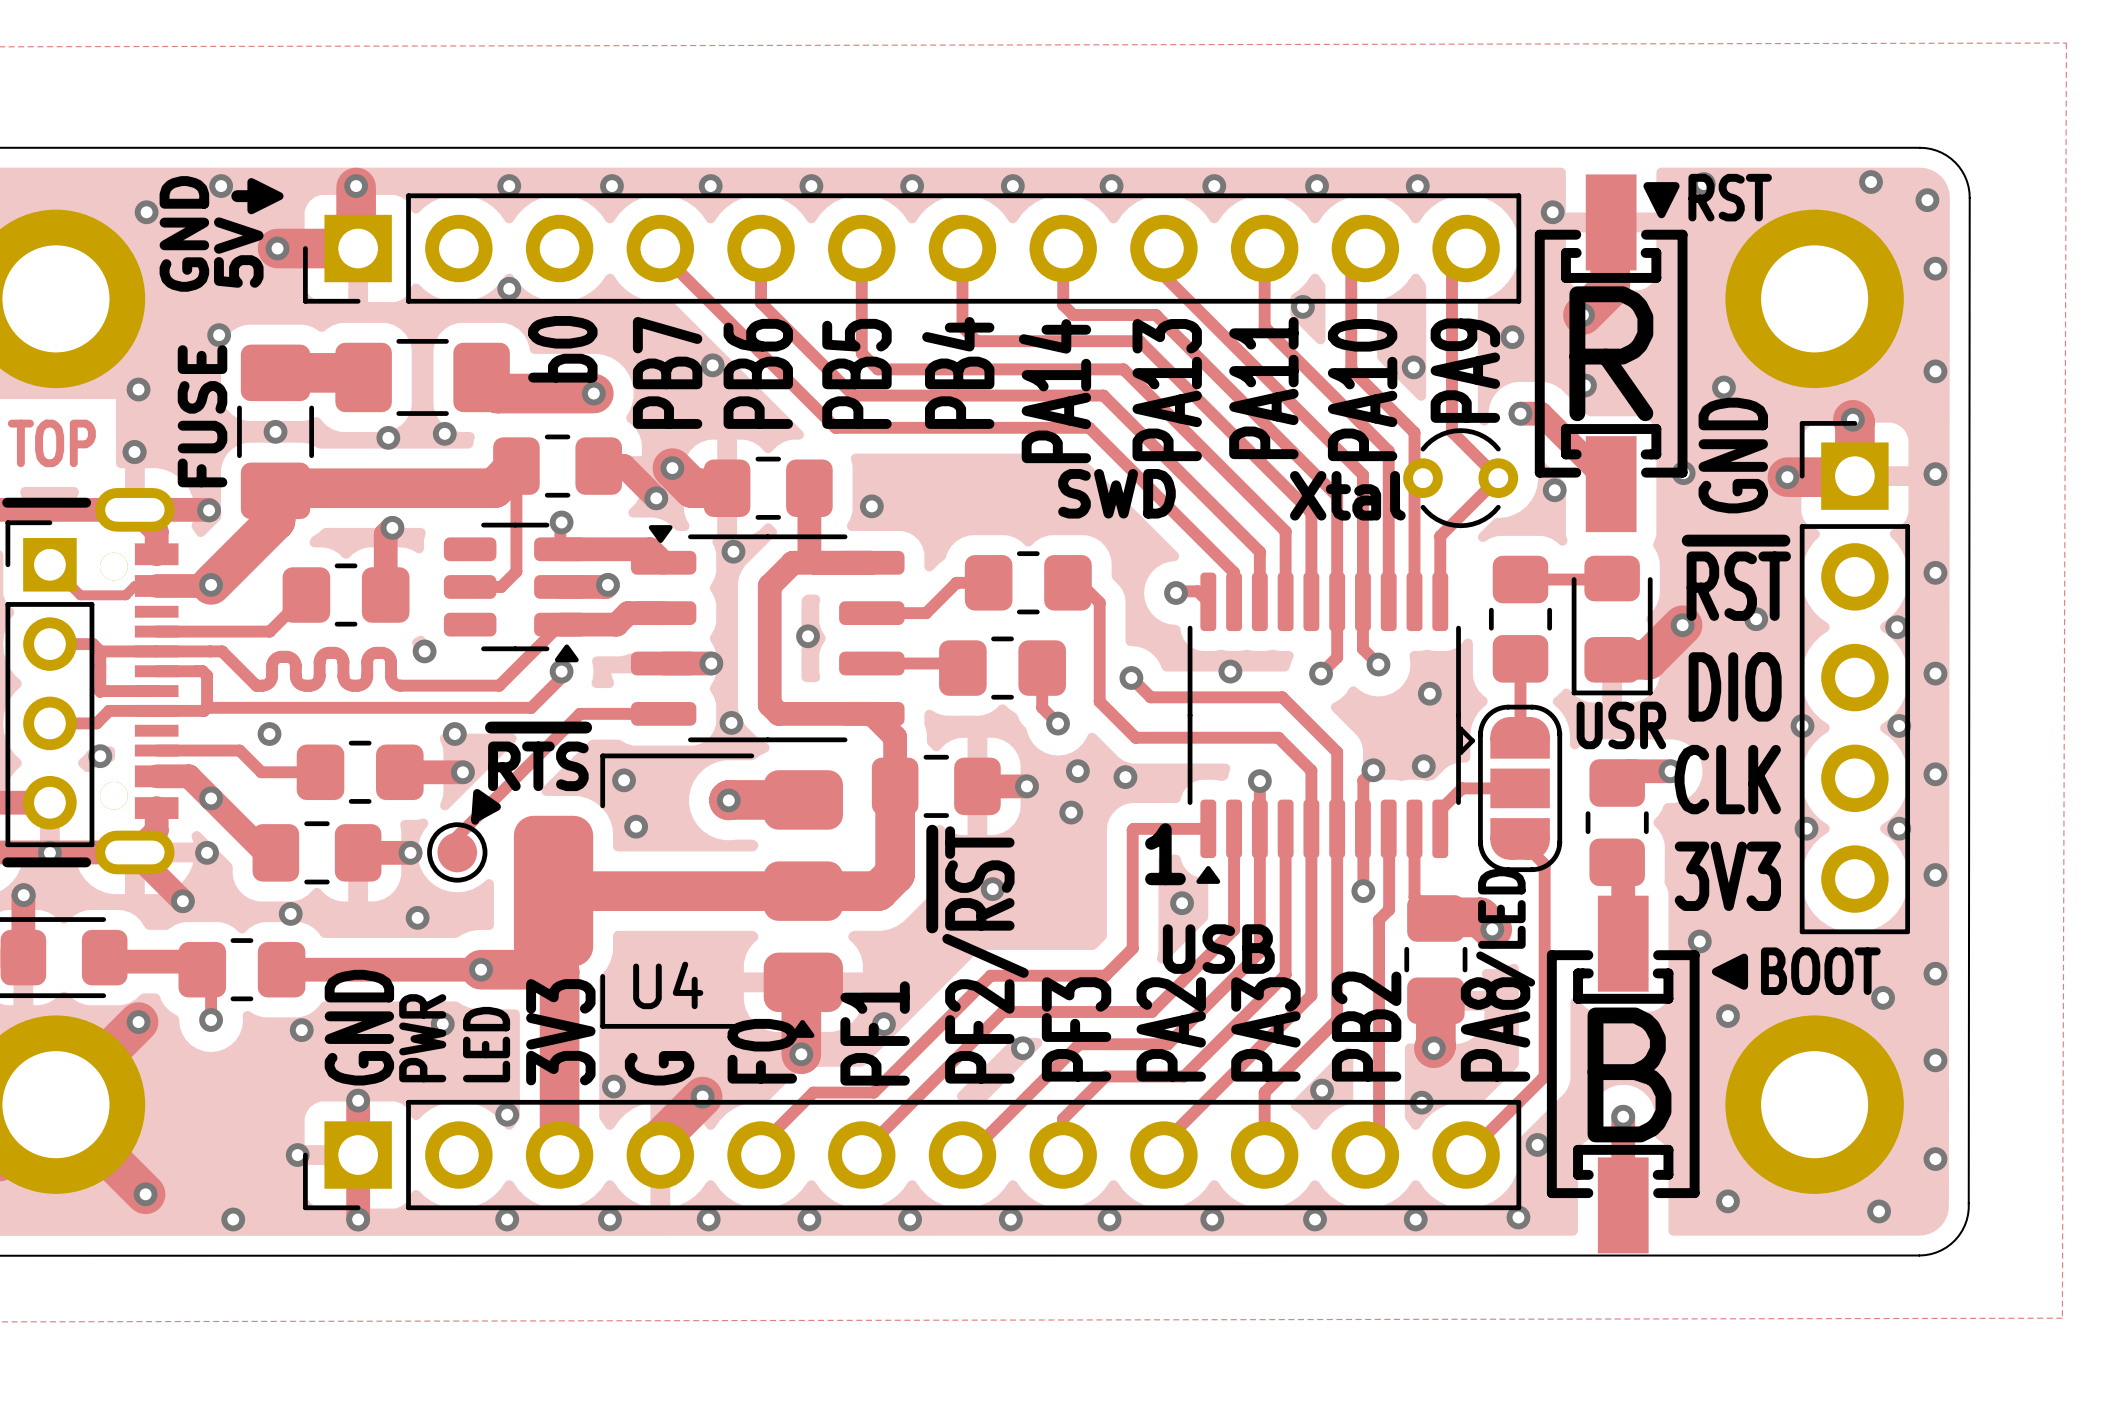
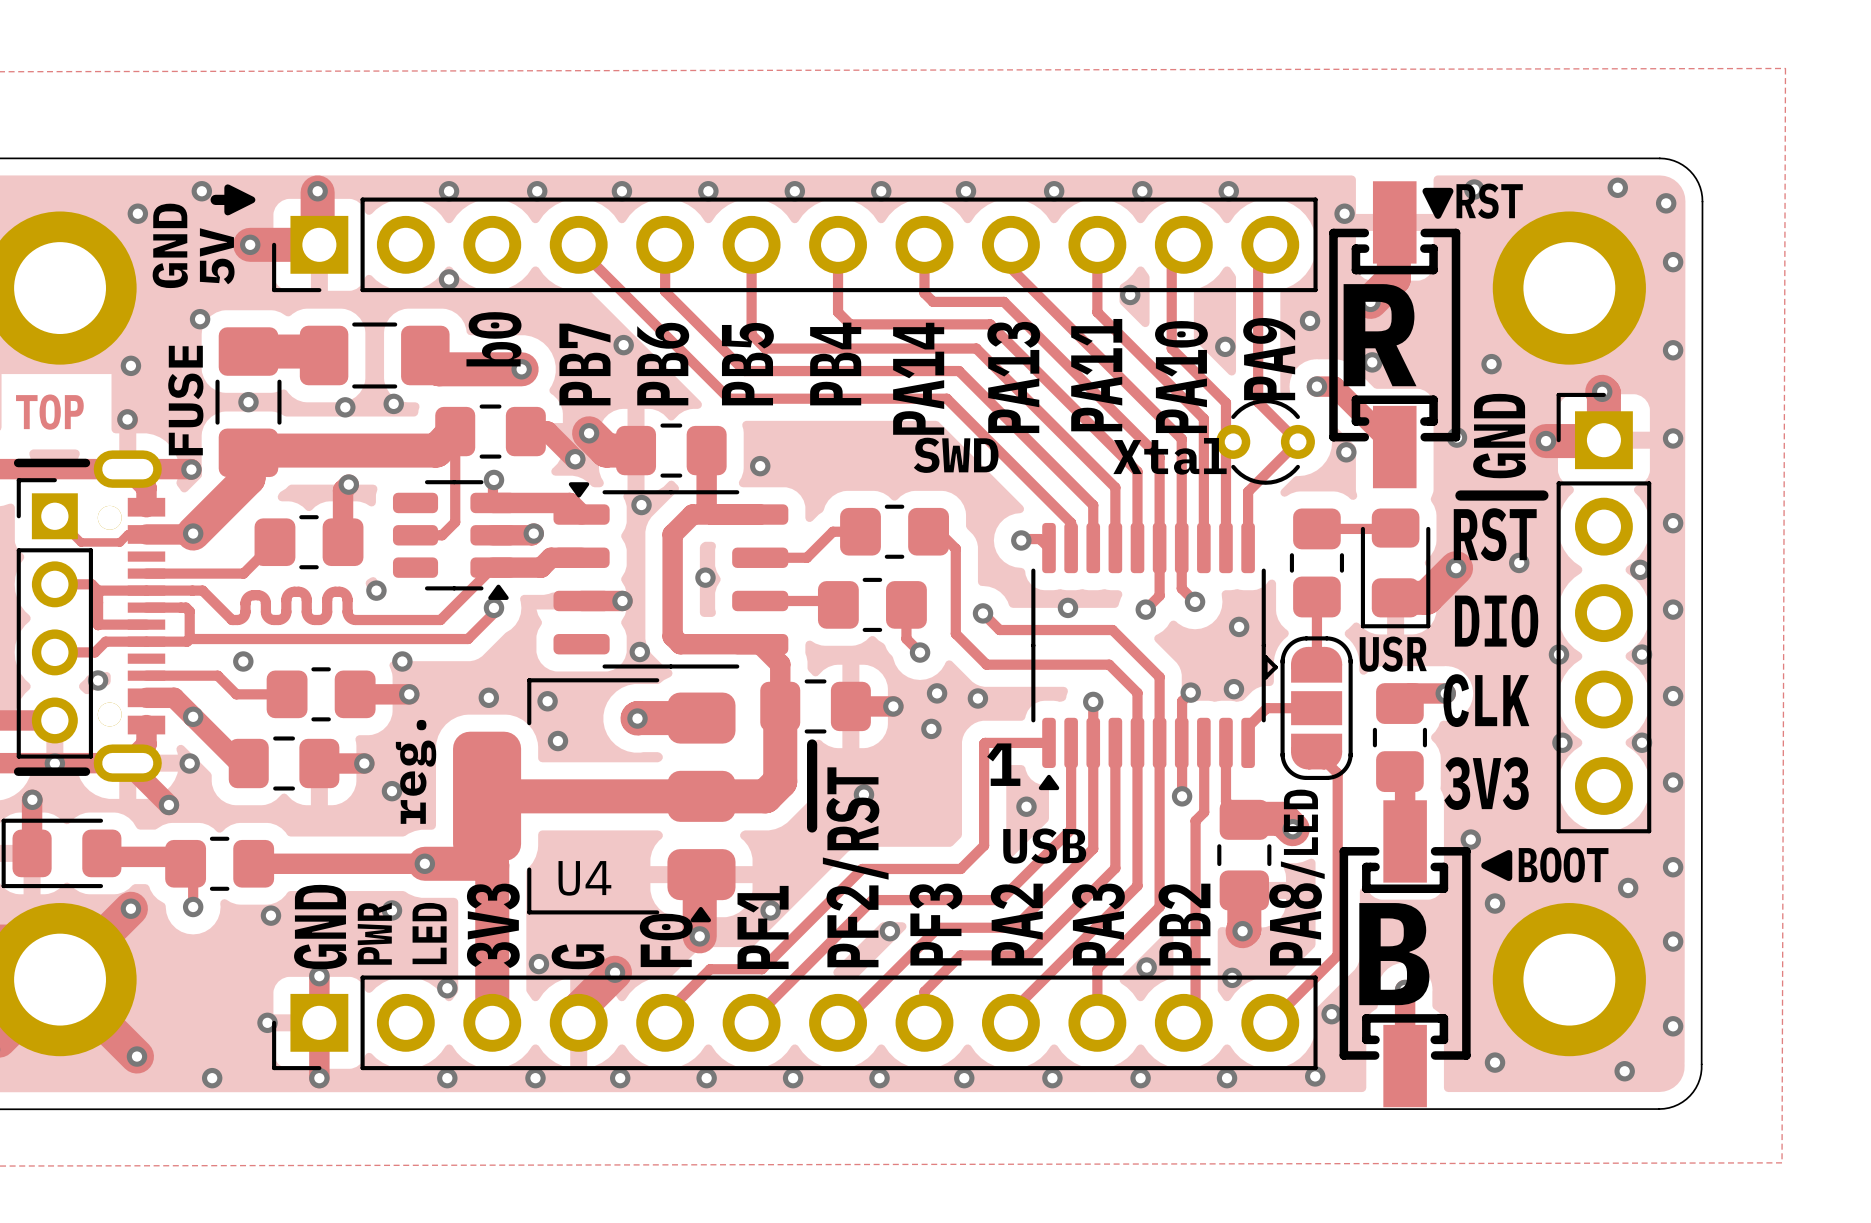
track: (663, 713) (580, 713) (457, 836) (457, 852) -> none
line: (490, 727) (586, 727) -> none
text: RTS (538, 766) -> none
via: none -> (488, 697)
drawing: [471, 789, 501, 825] -> none
part: (457, 852) -> none
text: none -> reg. (416, 771)
via: (290, 913) -> none
via position: (417, 917) -> (391, 791)

